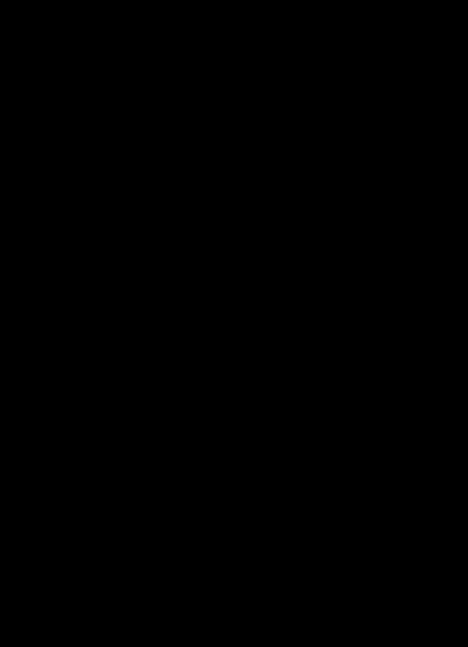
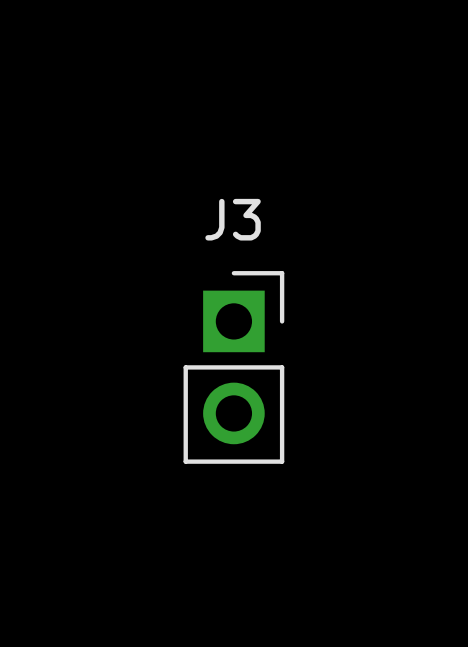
J3: none -> (233, 367)

